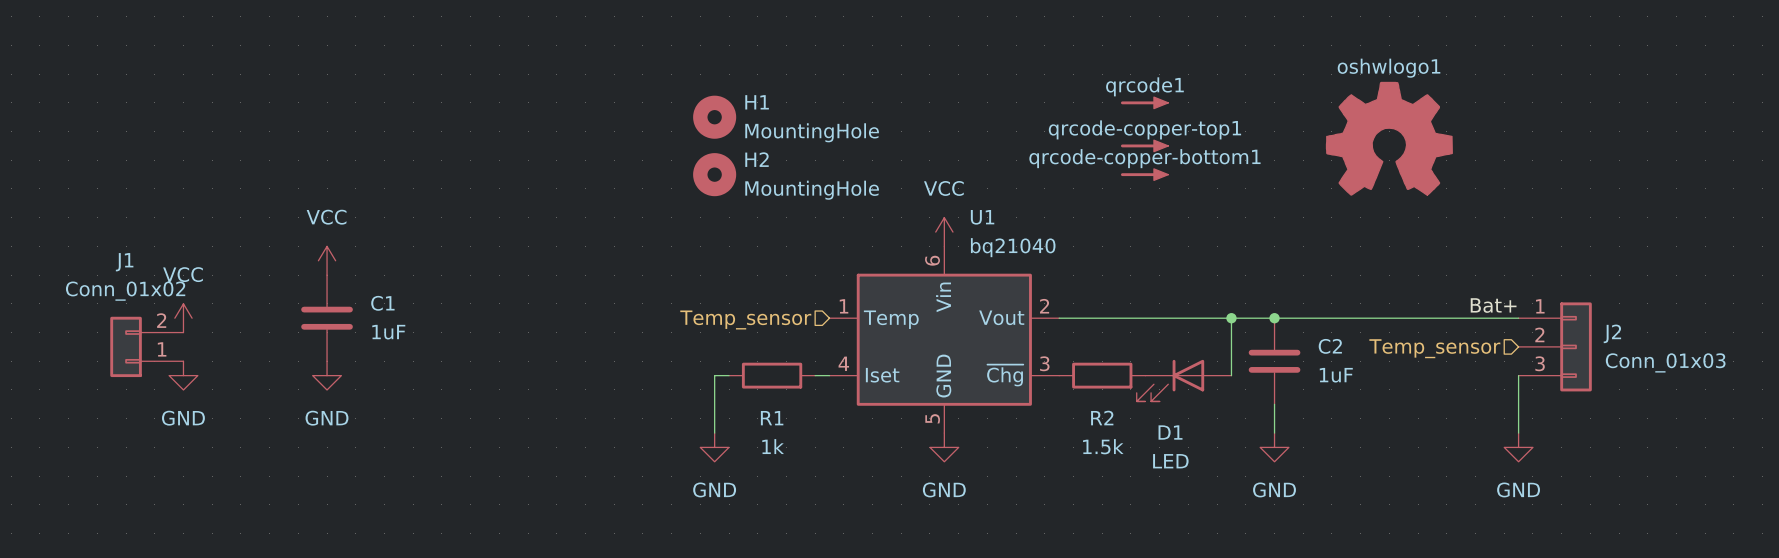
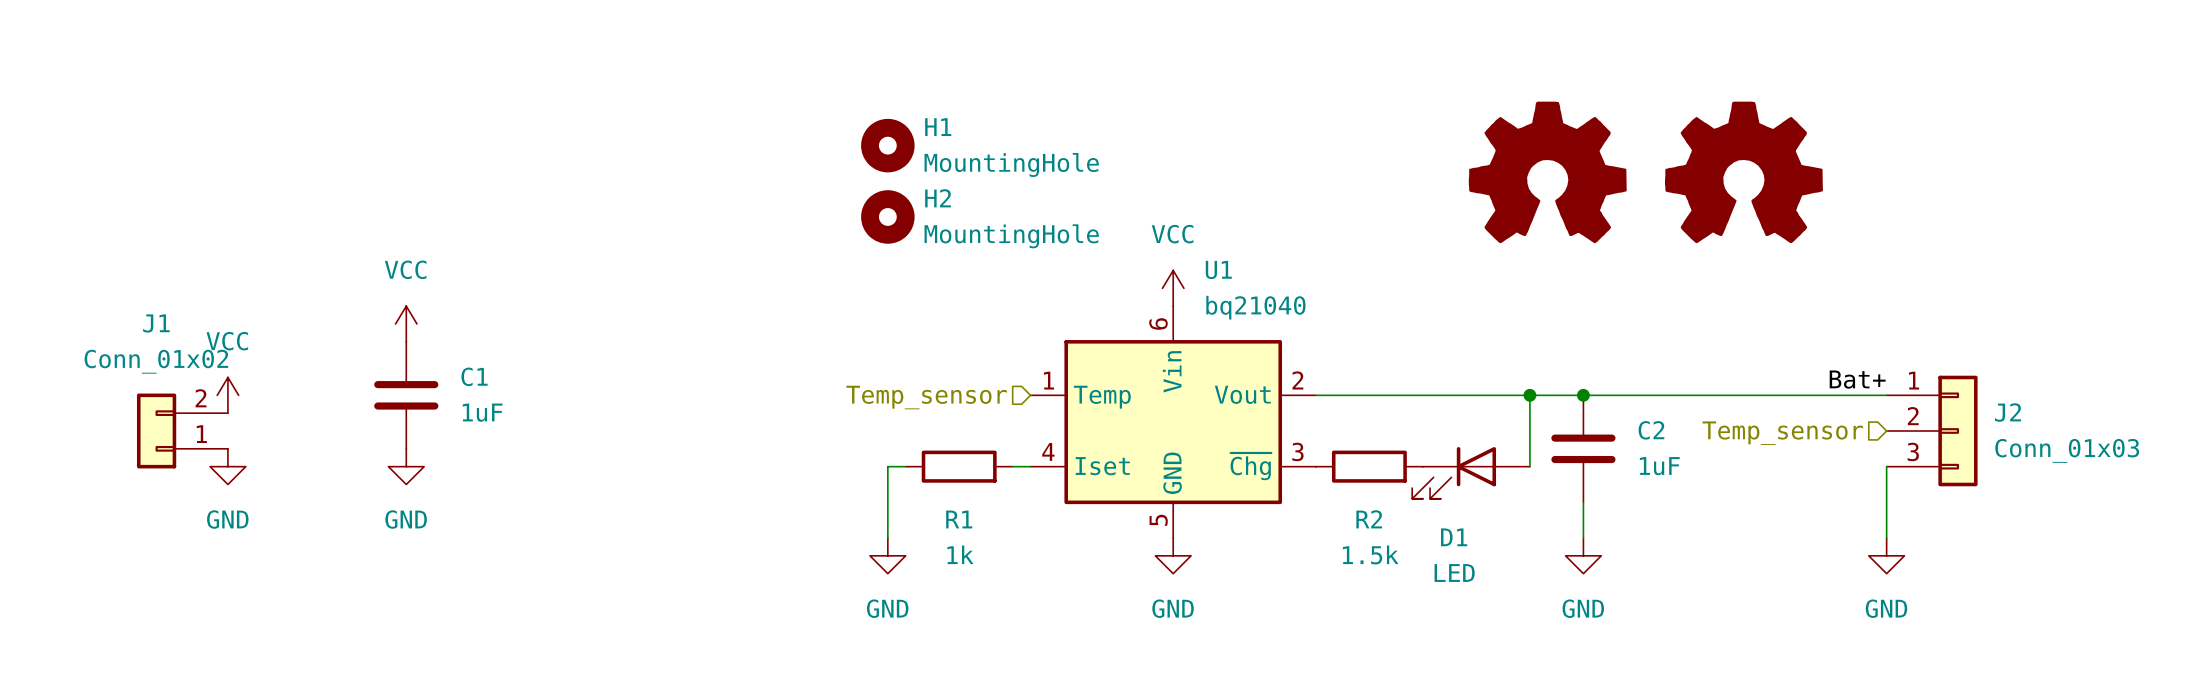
qrcode1: (1144, 102) -> none
part: none -> (1547, 172)
oshwlogo1: (1389, 138) -> none
part: none -> (1743, 172)
qrcode-copper-top1: (1144, 145) -> none
qrcode-copper-bottom1: (1144, 174) -> none

